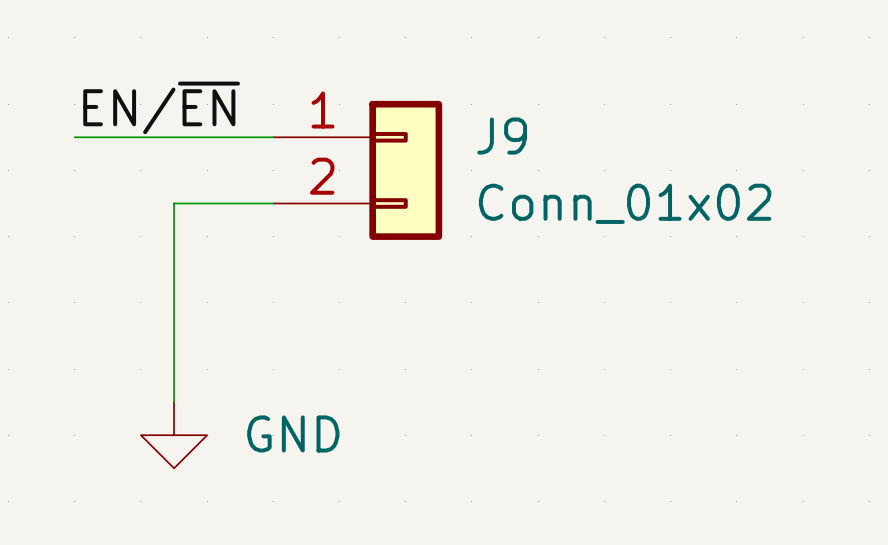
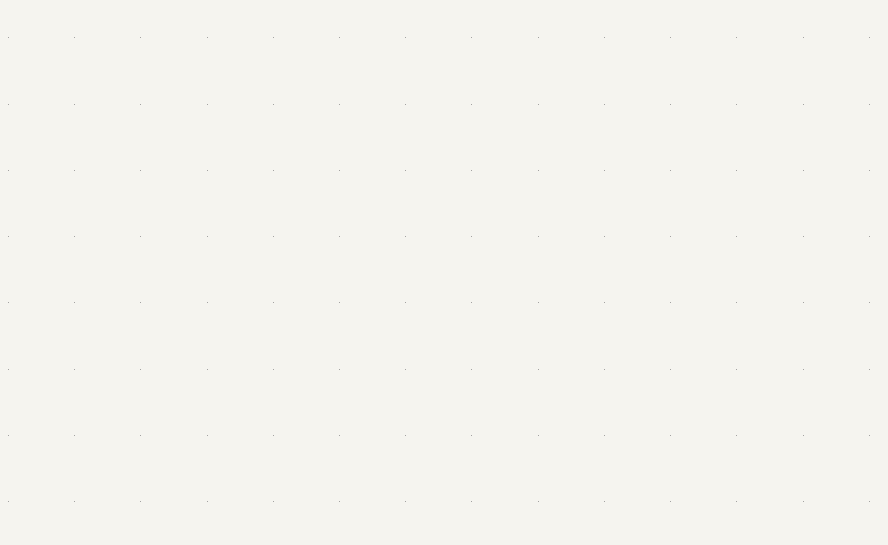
label: EN/~{EN} (161, 107) -> none
wire: (74, 137) (273, 137) -> none
J9: Conn_01x02 (357, 170) -> none
wire: (273, 203) (174, 203) (174, 402) -> none
power symbol: GND (174, 435) -> none

